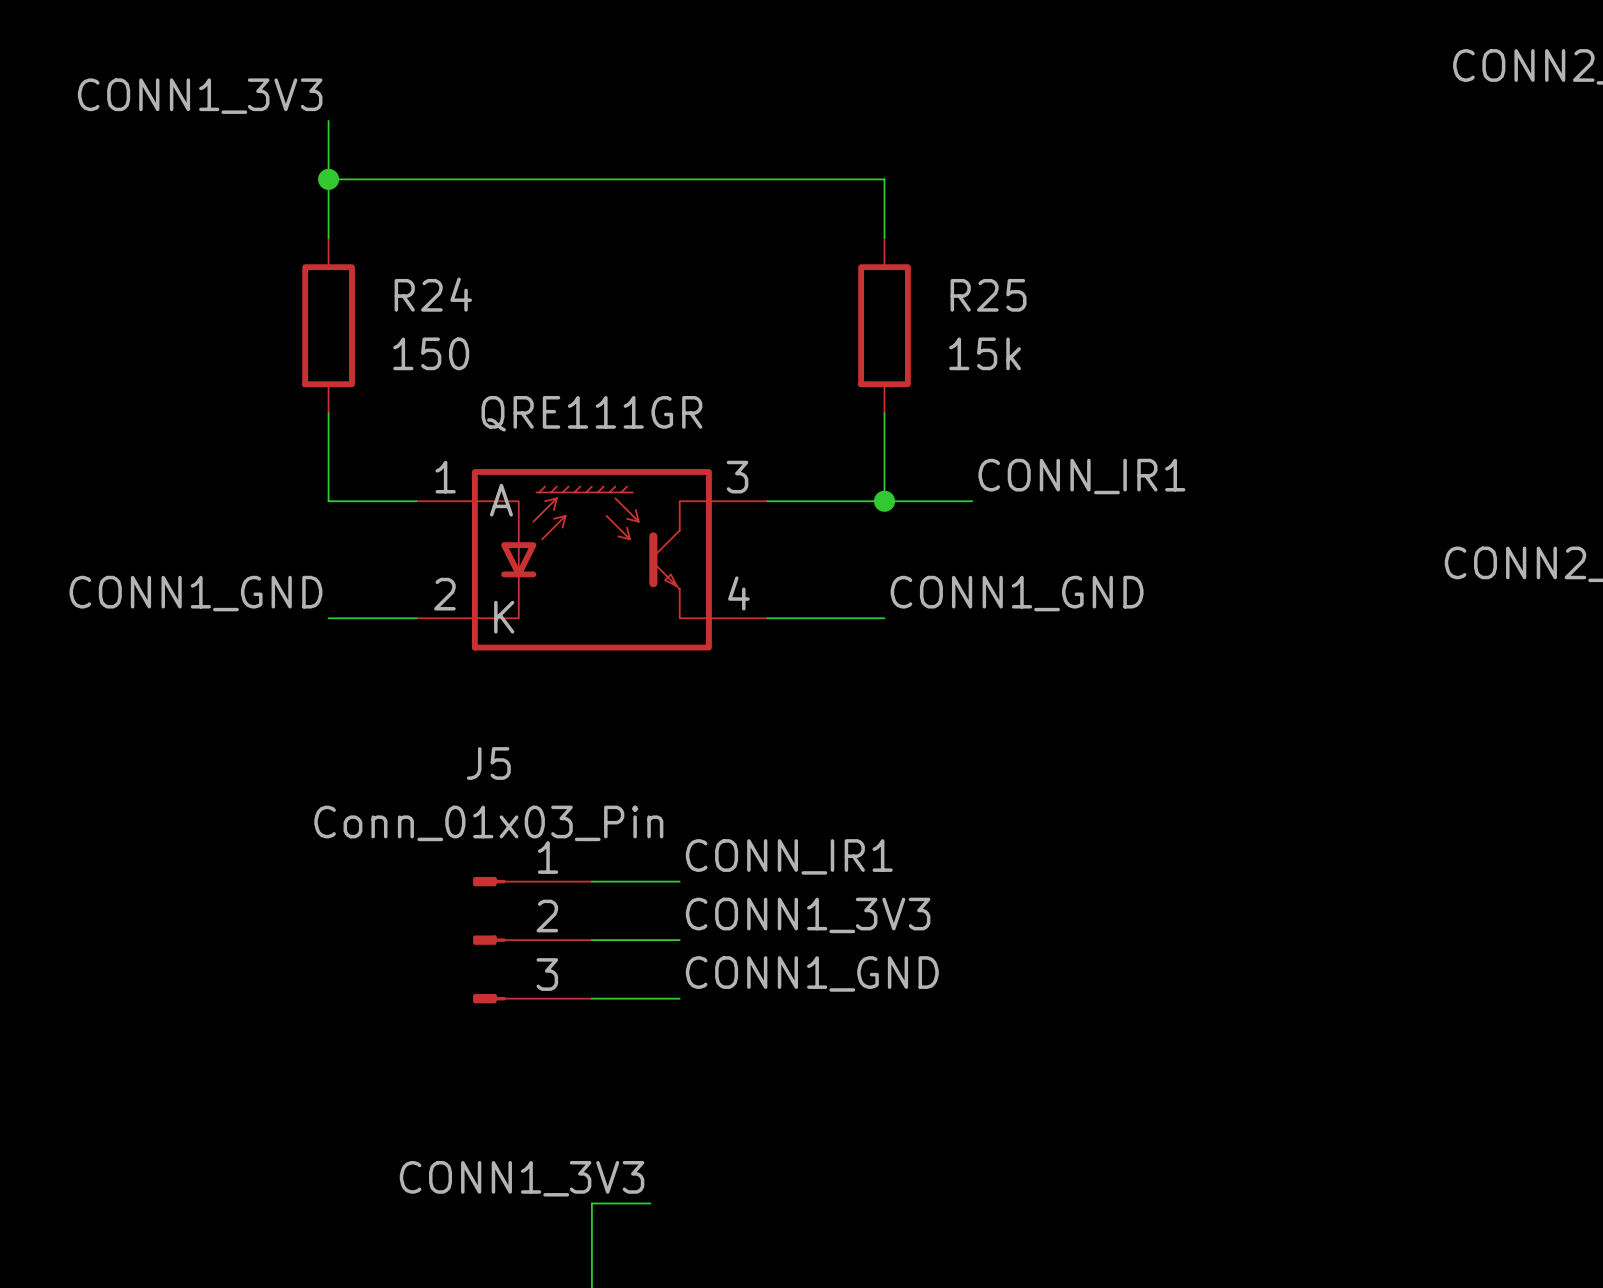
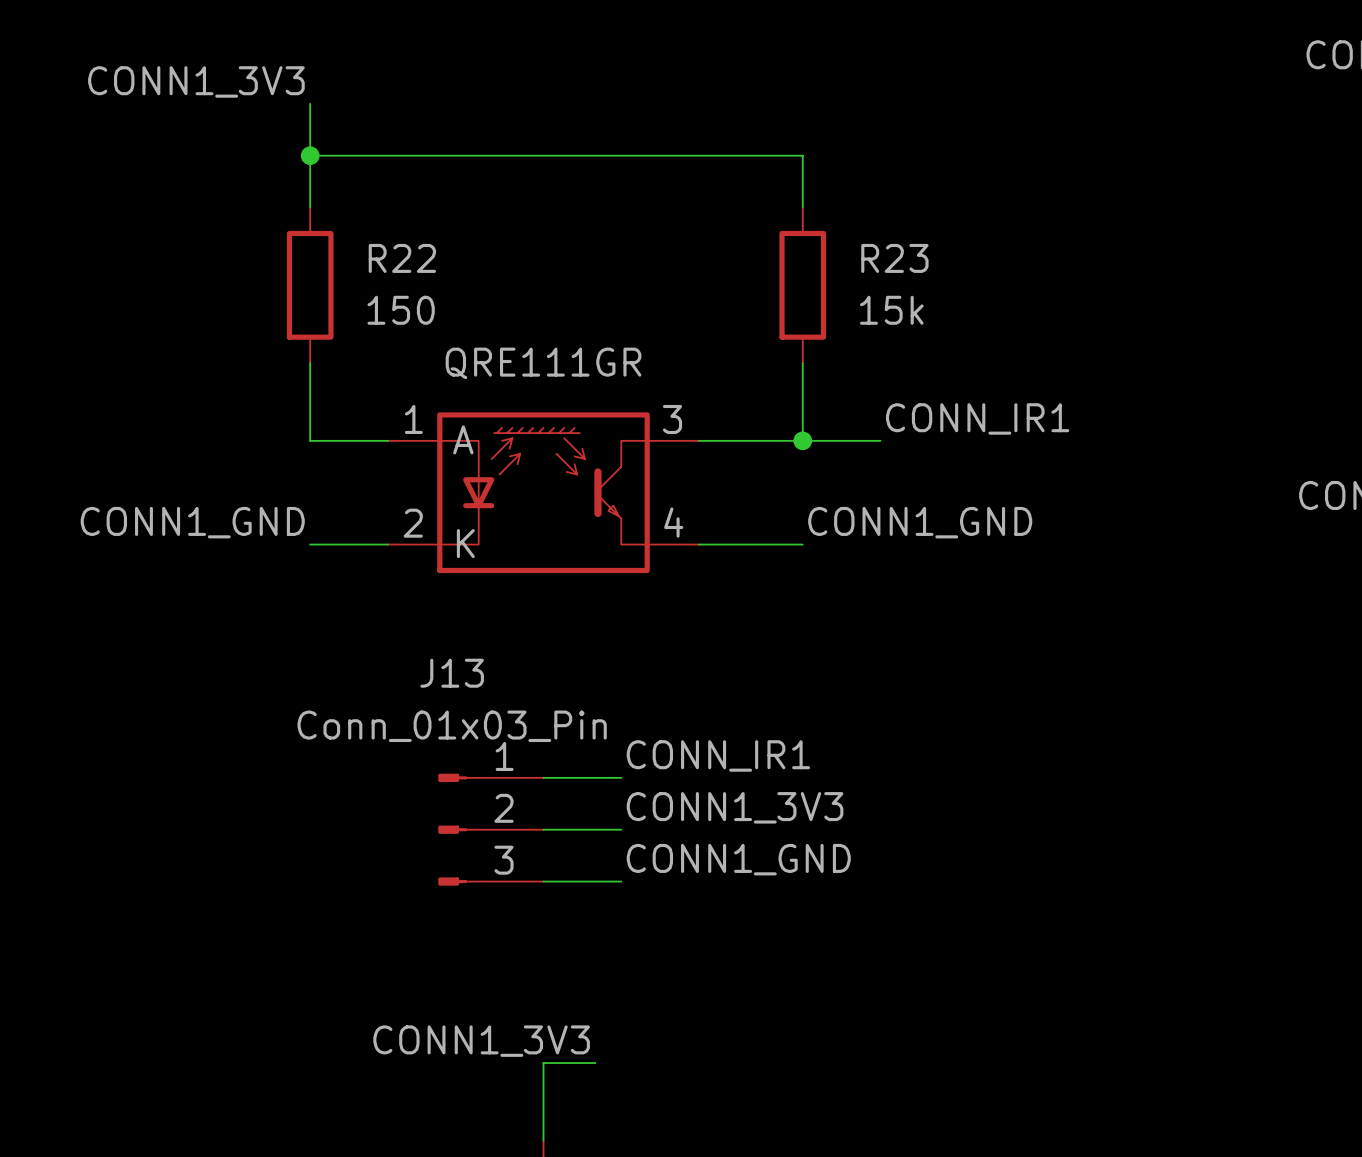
R24 name: R24 (433, 294) -> R22 (402, 258)
R25 name: R25 (988, 295) -> R23 (894, 258)
J5 name: J5 (488, 763) -> J13 (452, 673)

